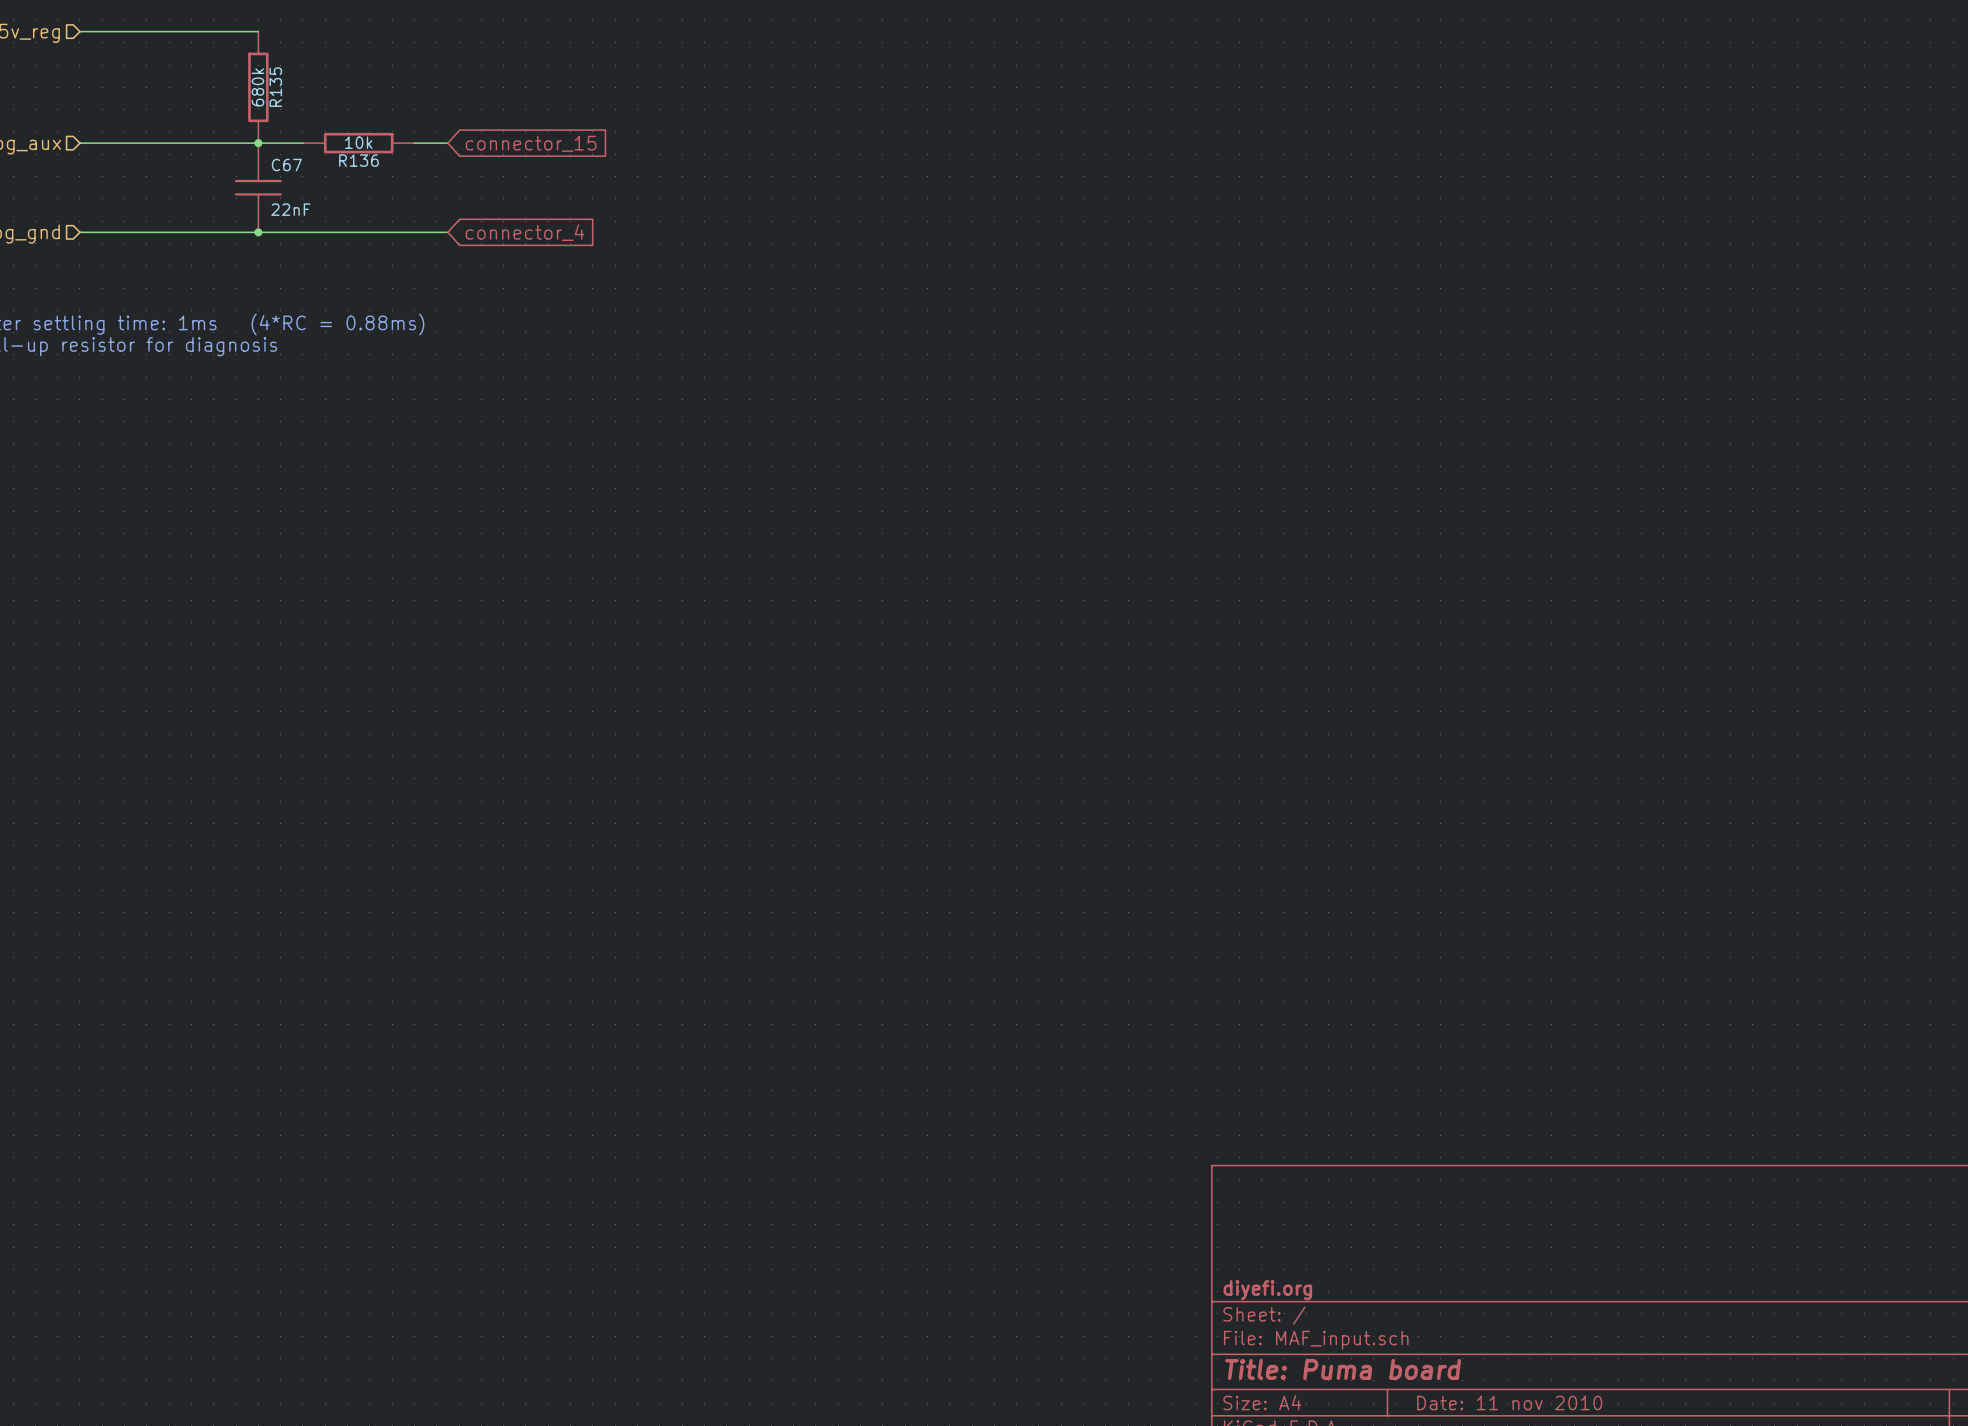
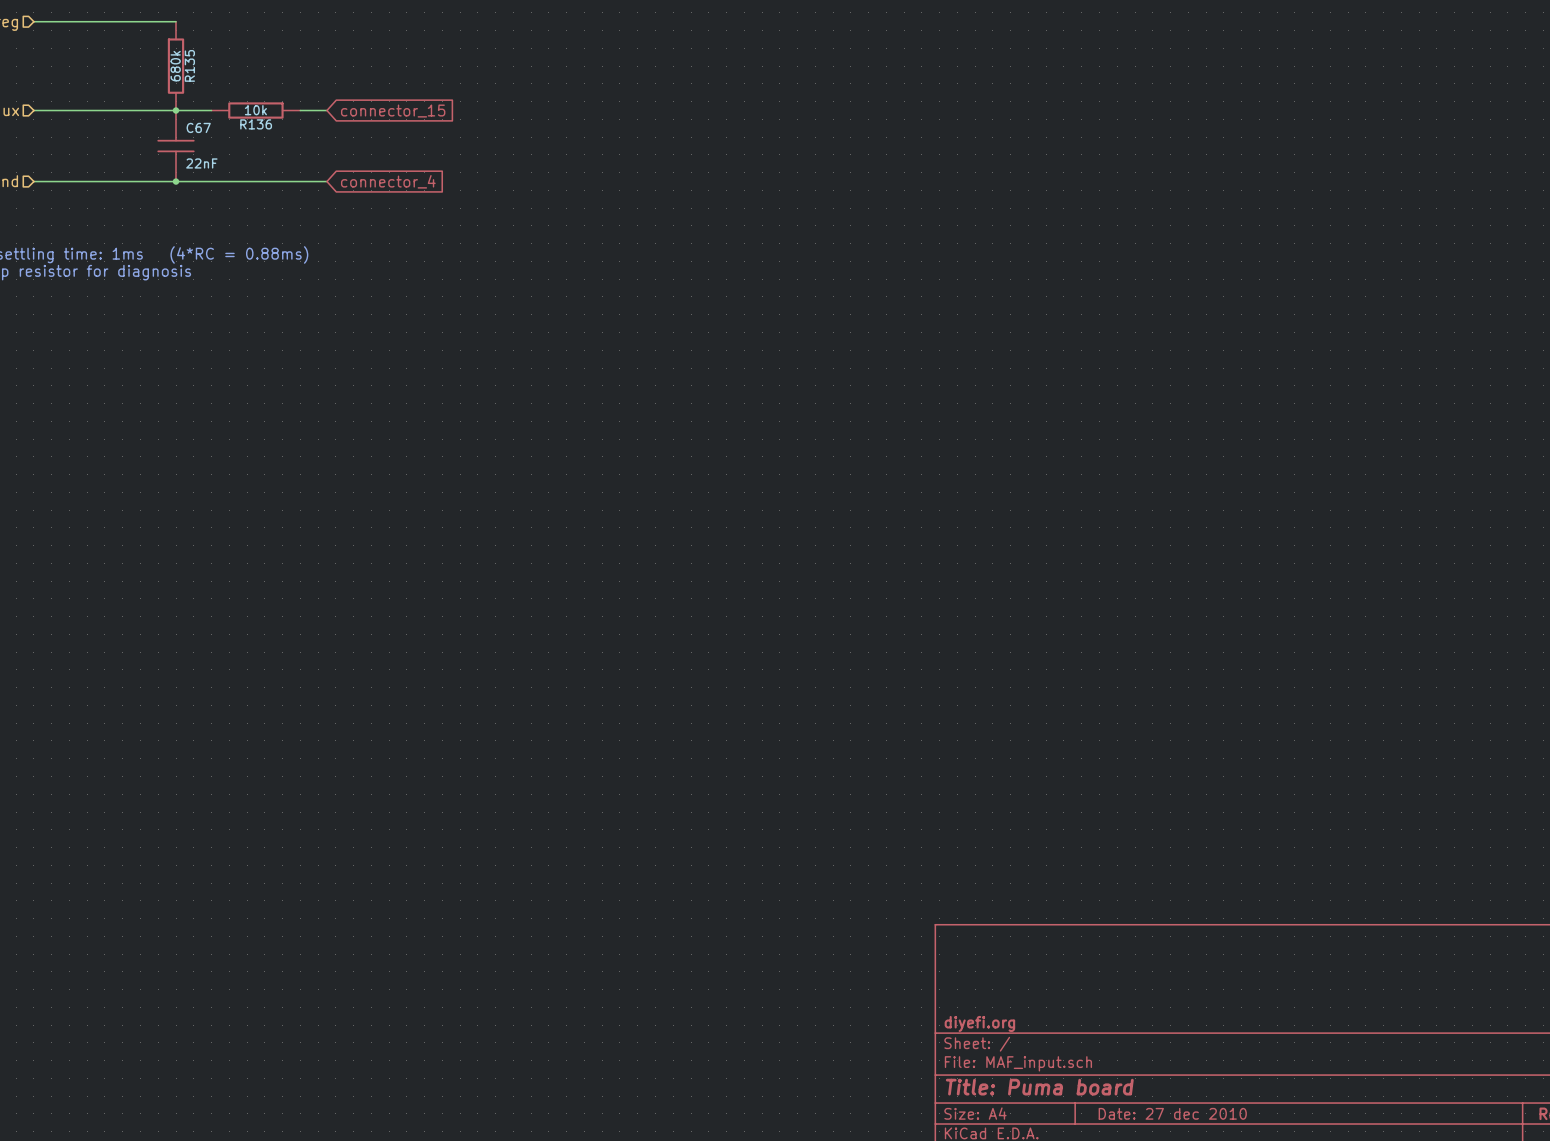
title block: Date: 11 nov 2010 (1509, 1403) -> Date: 27 dec 2010 (1172, 1113)

